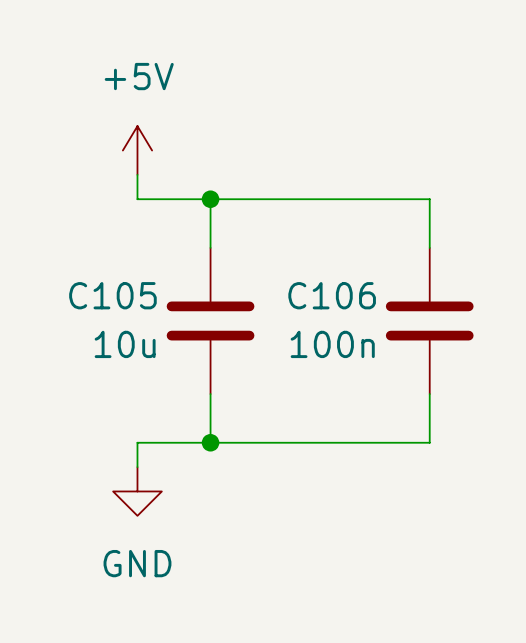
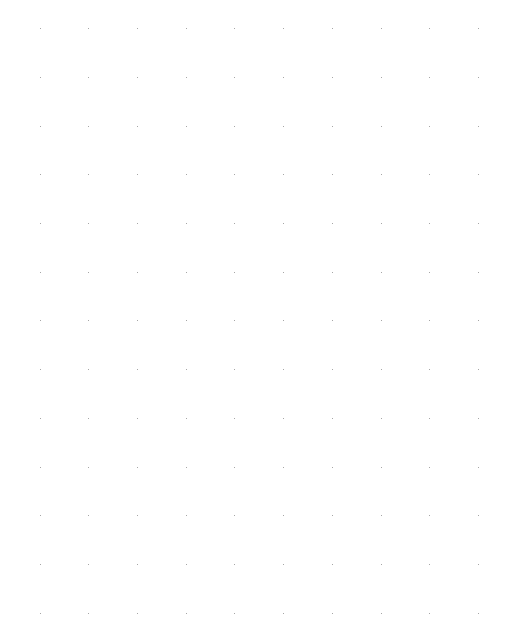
power symbol: +5V (137, 150) -> none
wire: (137, 174) (137, 199) (429, 199) (429, 247) -> none
wire: (210, 199) (210, 247) -> none
junction: (210, 199) -> none
C105: 10u (210, 320) -> none
C106: 100n (429, 320) -> none
wire: (210, 394) (210, 442) -> none
wire: (429, 394) (429, 442) (137, 442) (137, 467) -> none
junction: (210, 442) -> none
power symbol: GND (137, 491) -> none

